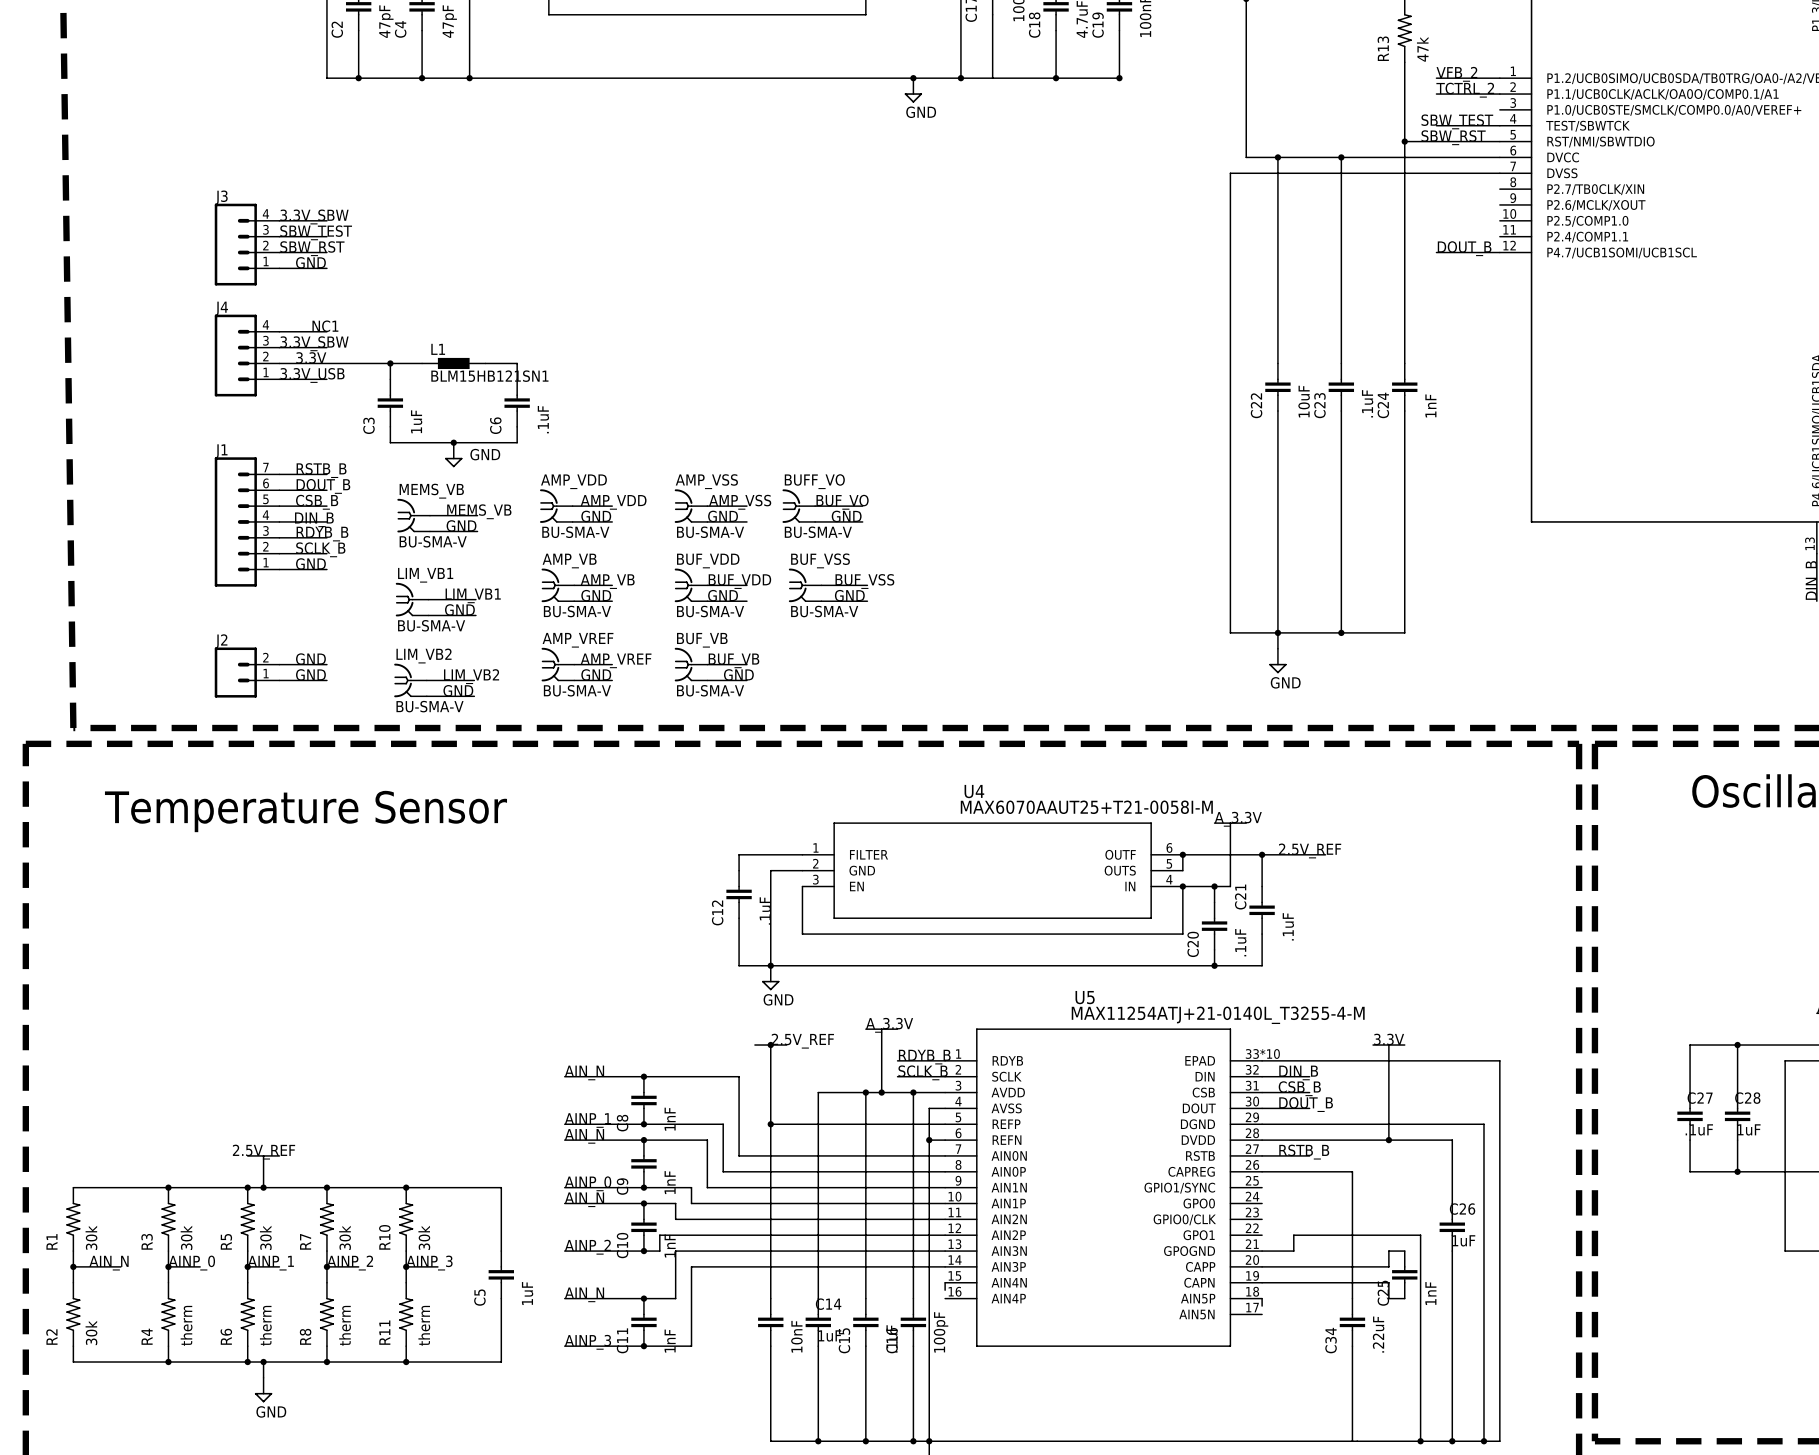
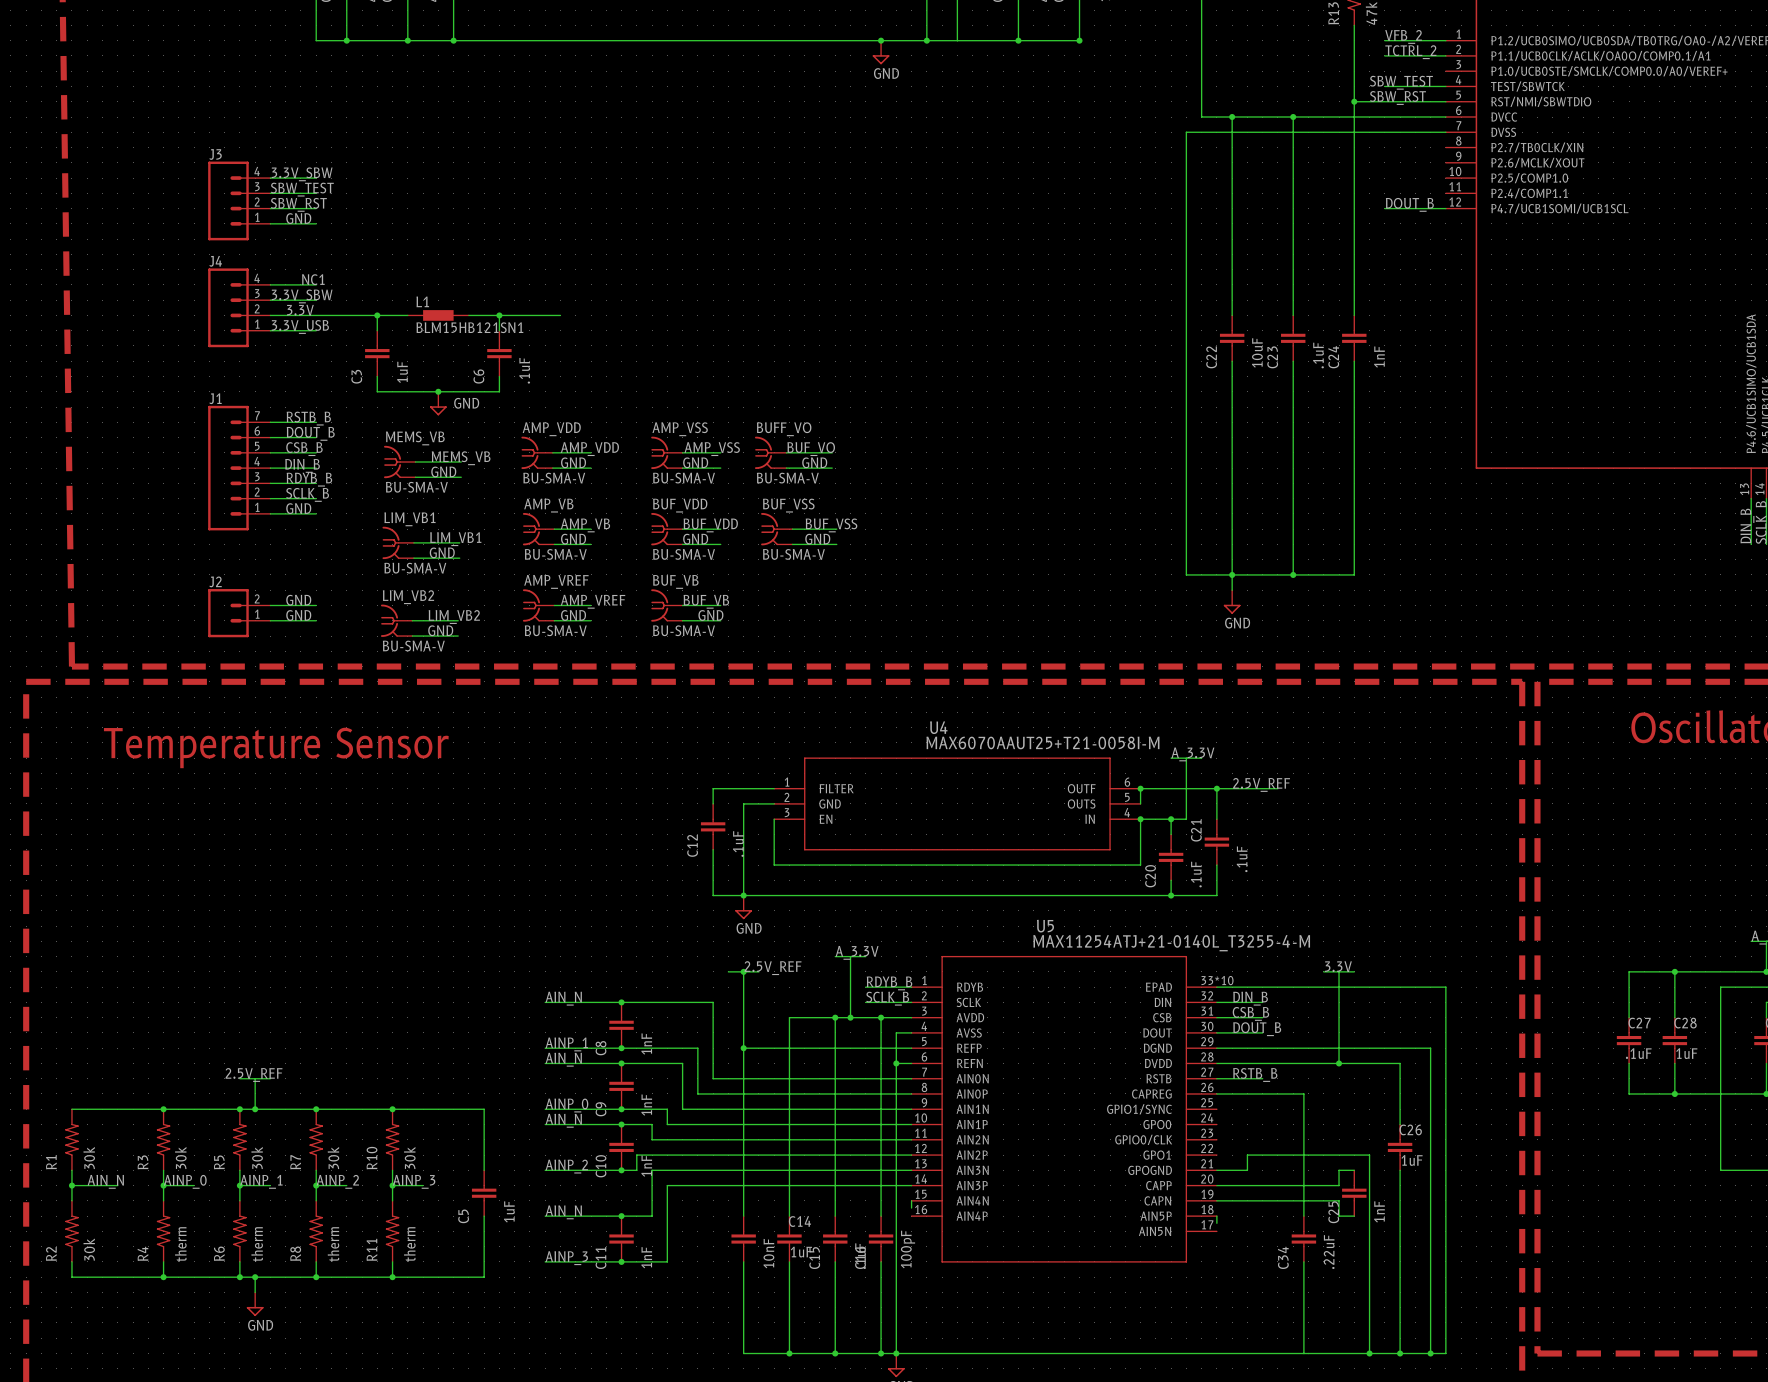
wire: none -> (499, 315) (560, 315)
junction: none -> (499, 315)

